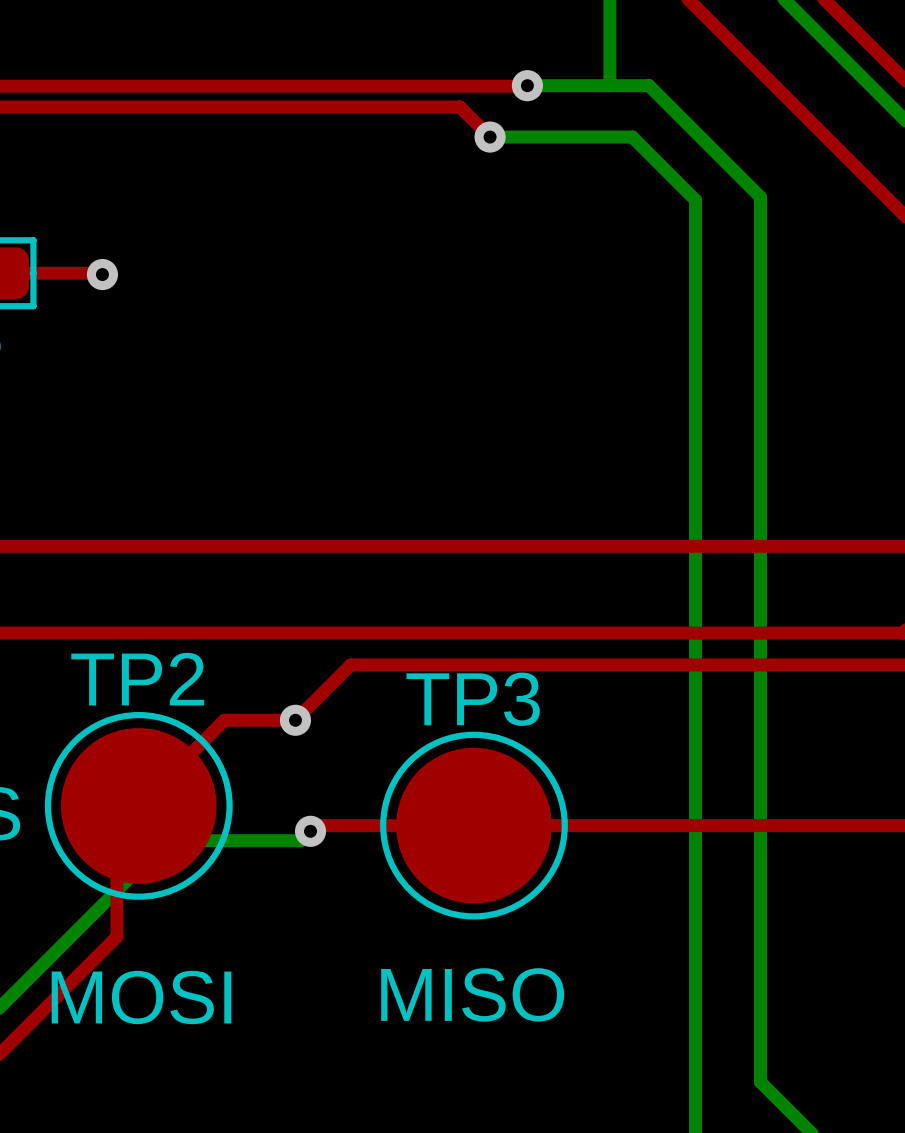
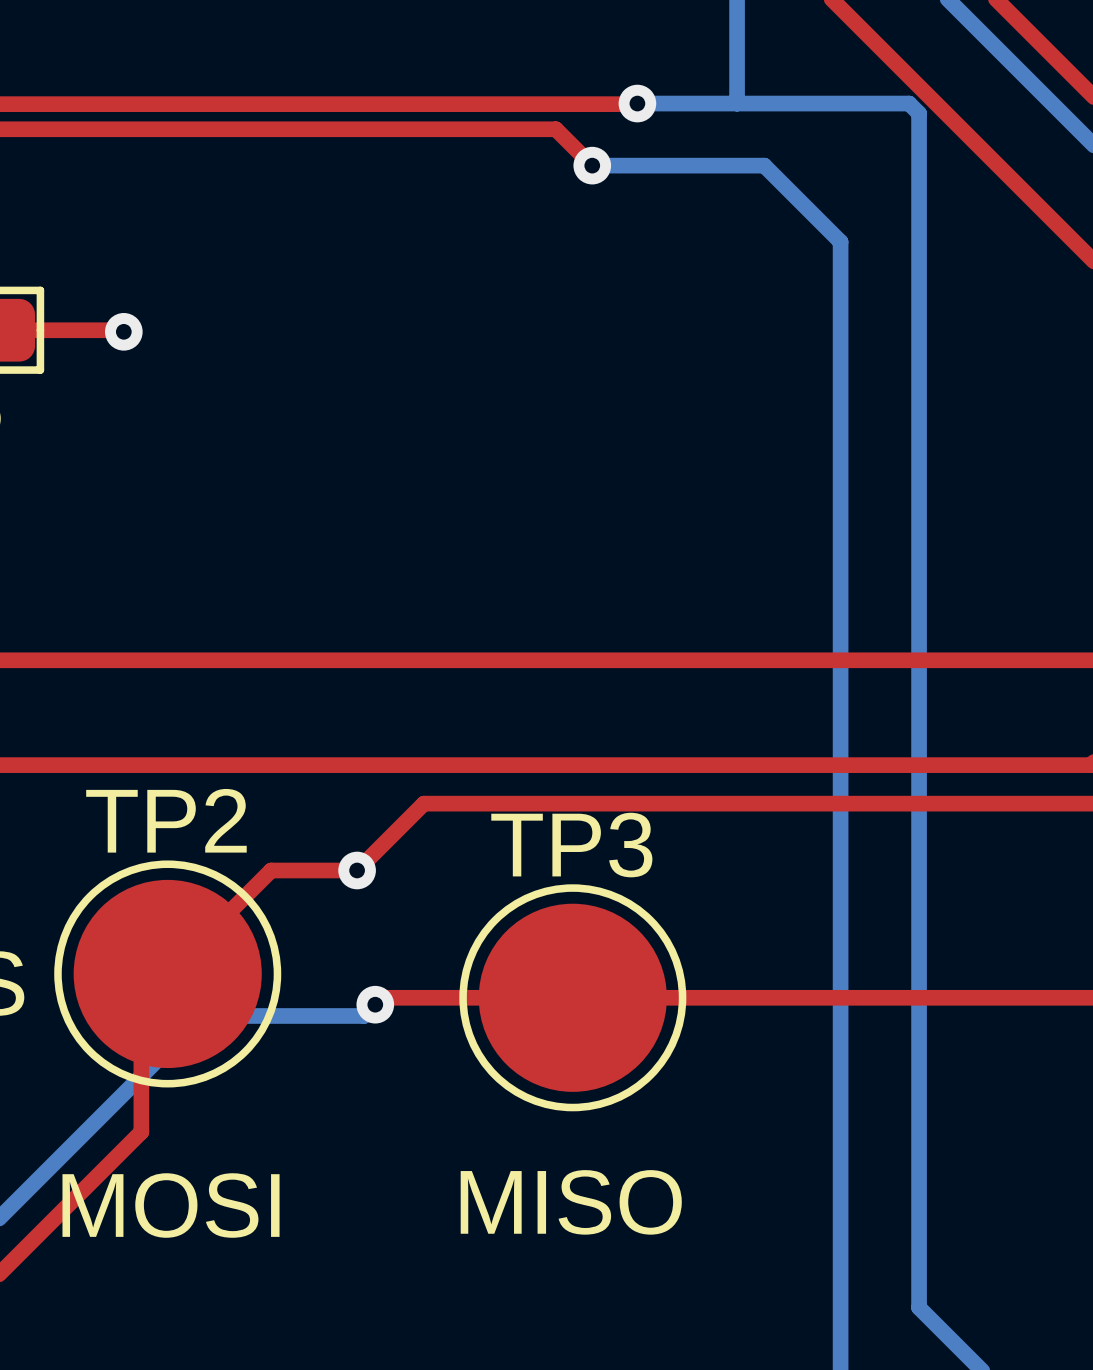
bottom track: (649, 85) (760, 197) -> (784, 103) (909, 103) (919, 113) (919, 238)

